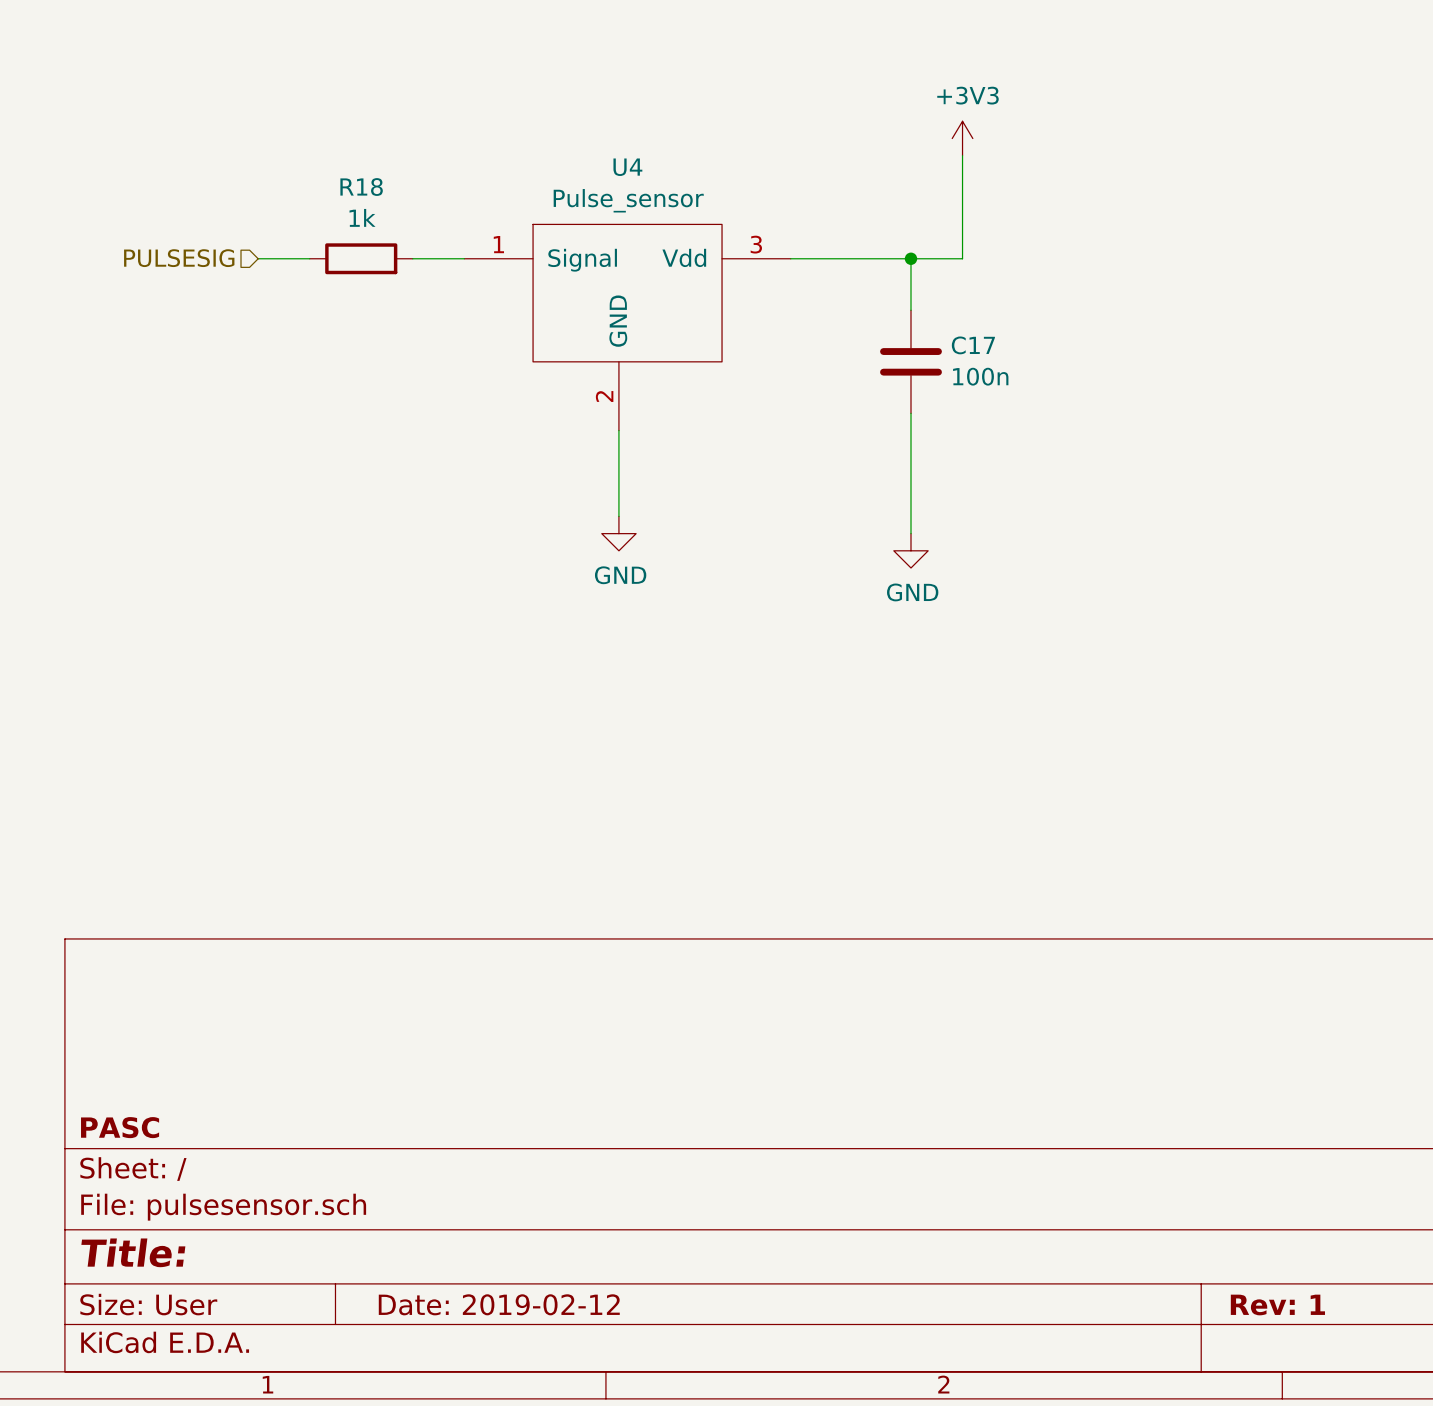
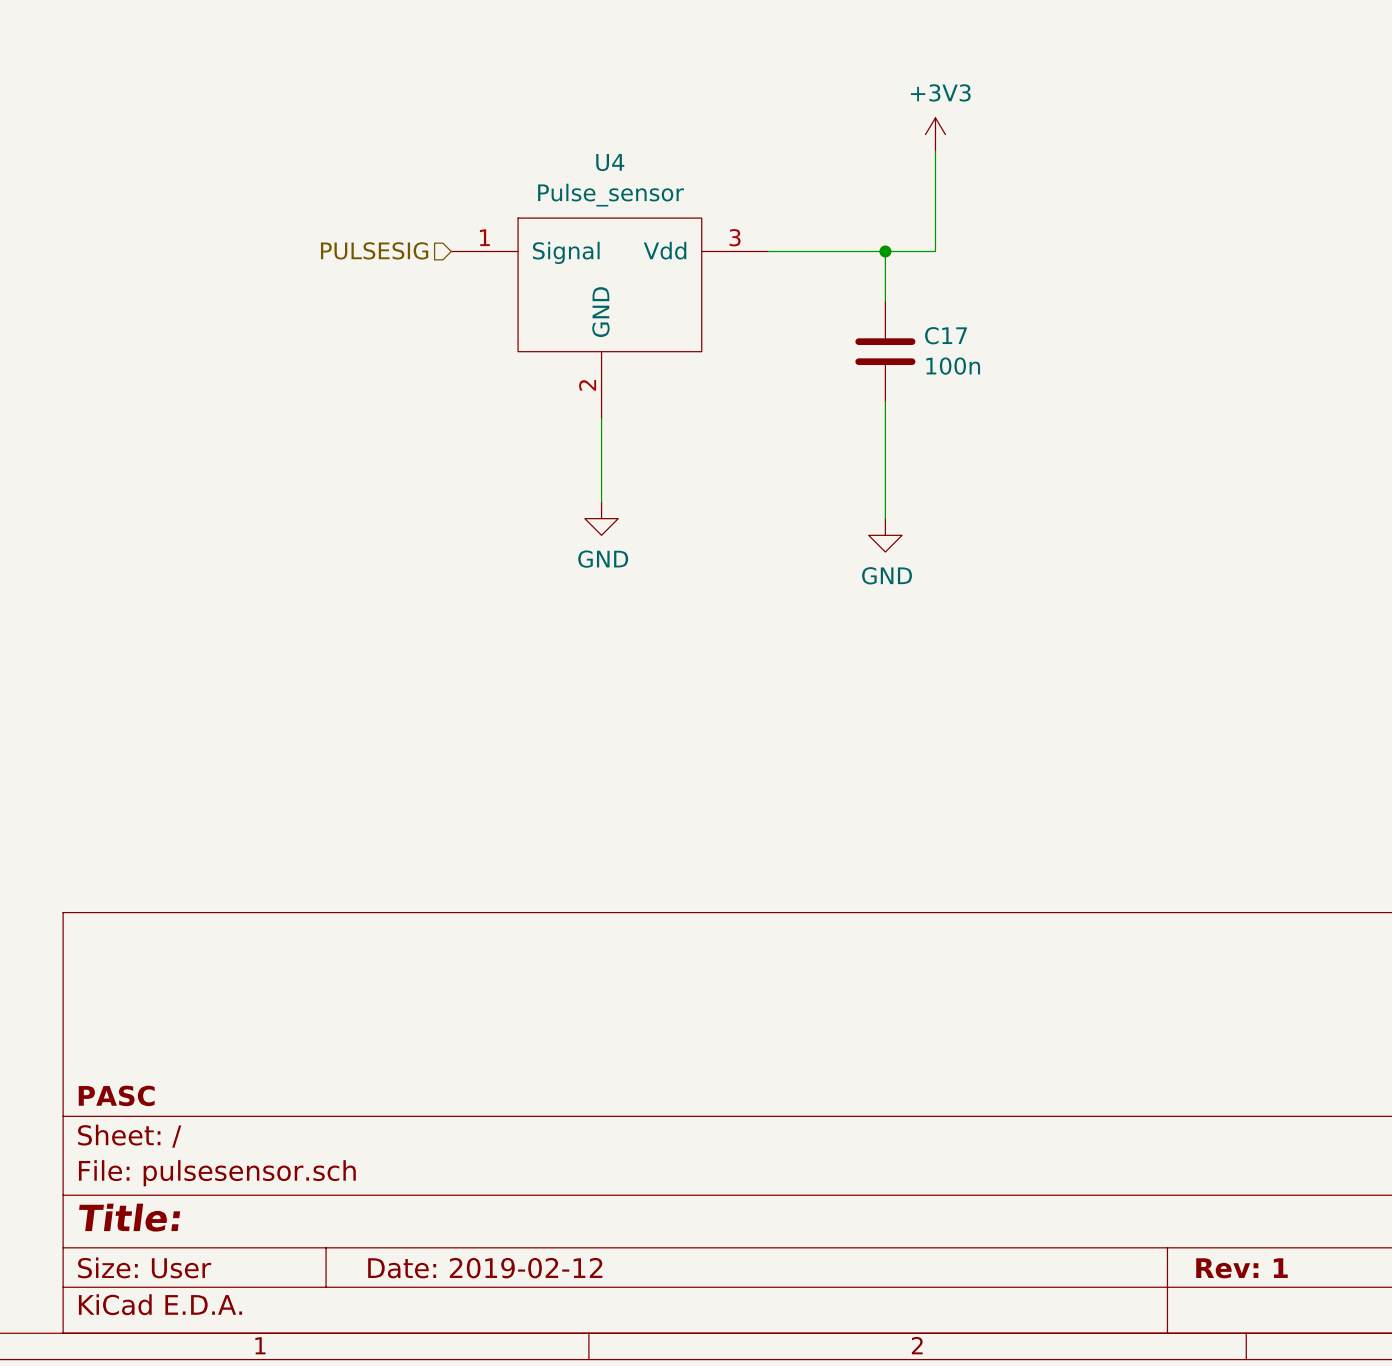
hierarchical label position: PULSESIG (179, 258) -> PULSESIG (374, 250)
wire: (258, 258) (309, 258) -> none
R18: 1k (361, 258) -> none
wire: (412, 258) (464, 258) -> none

